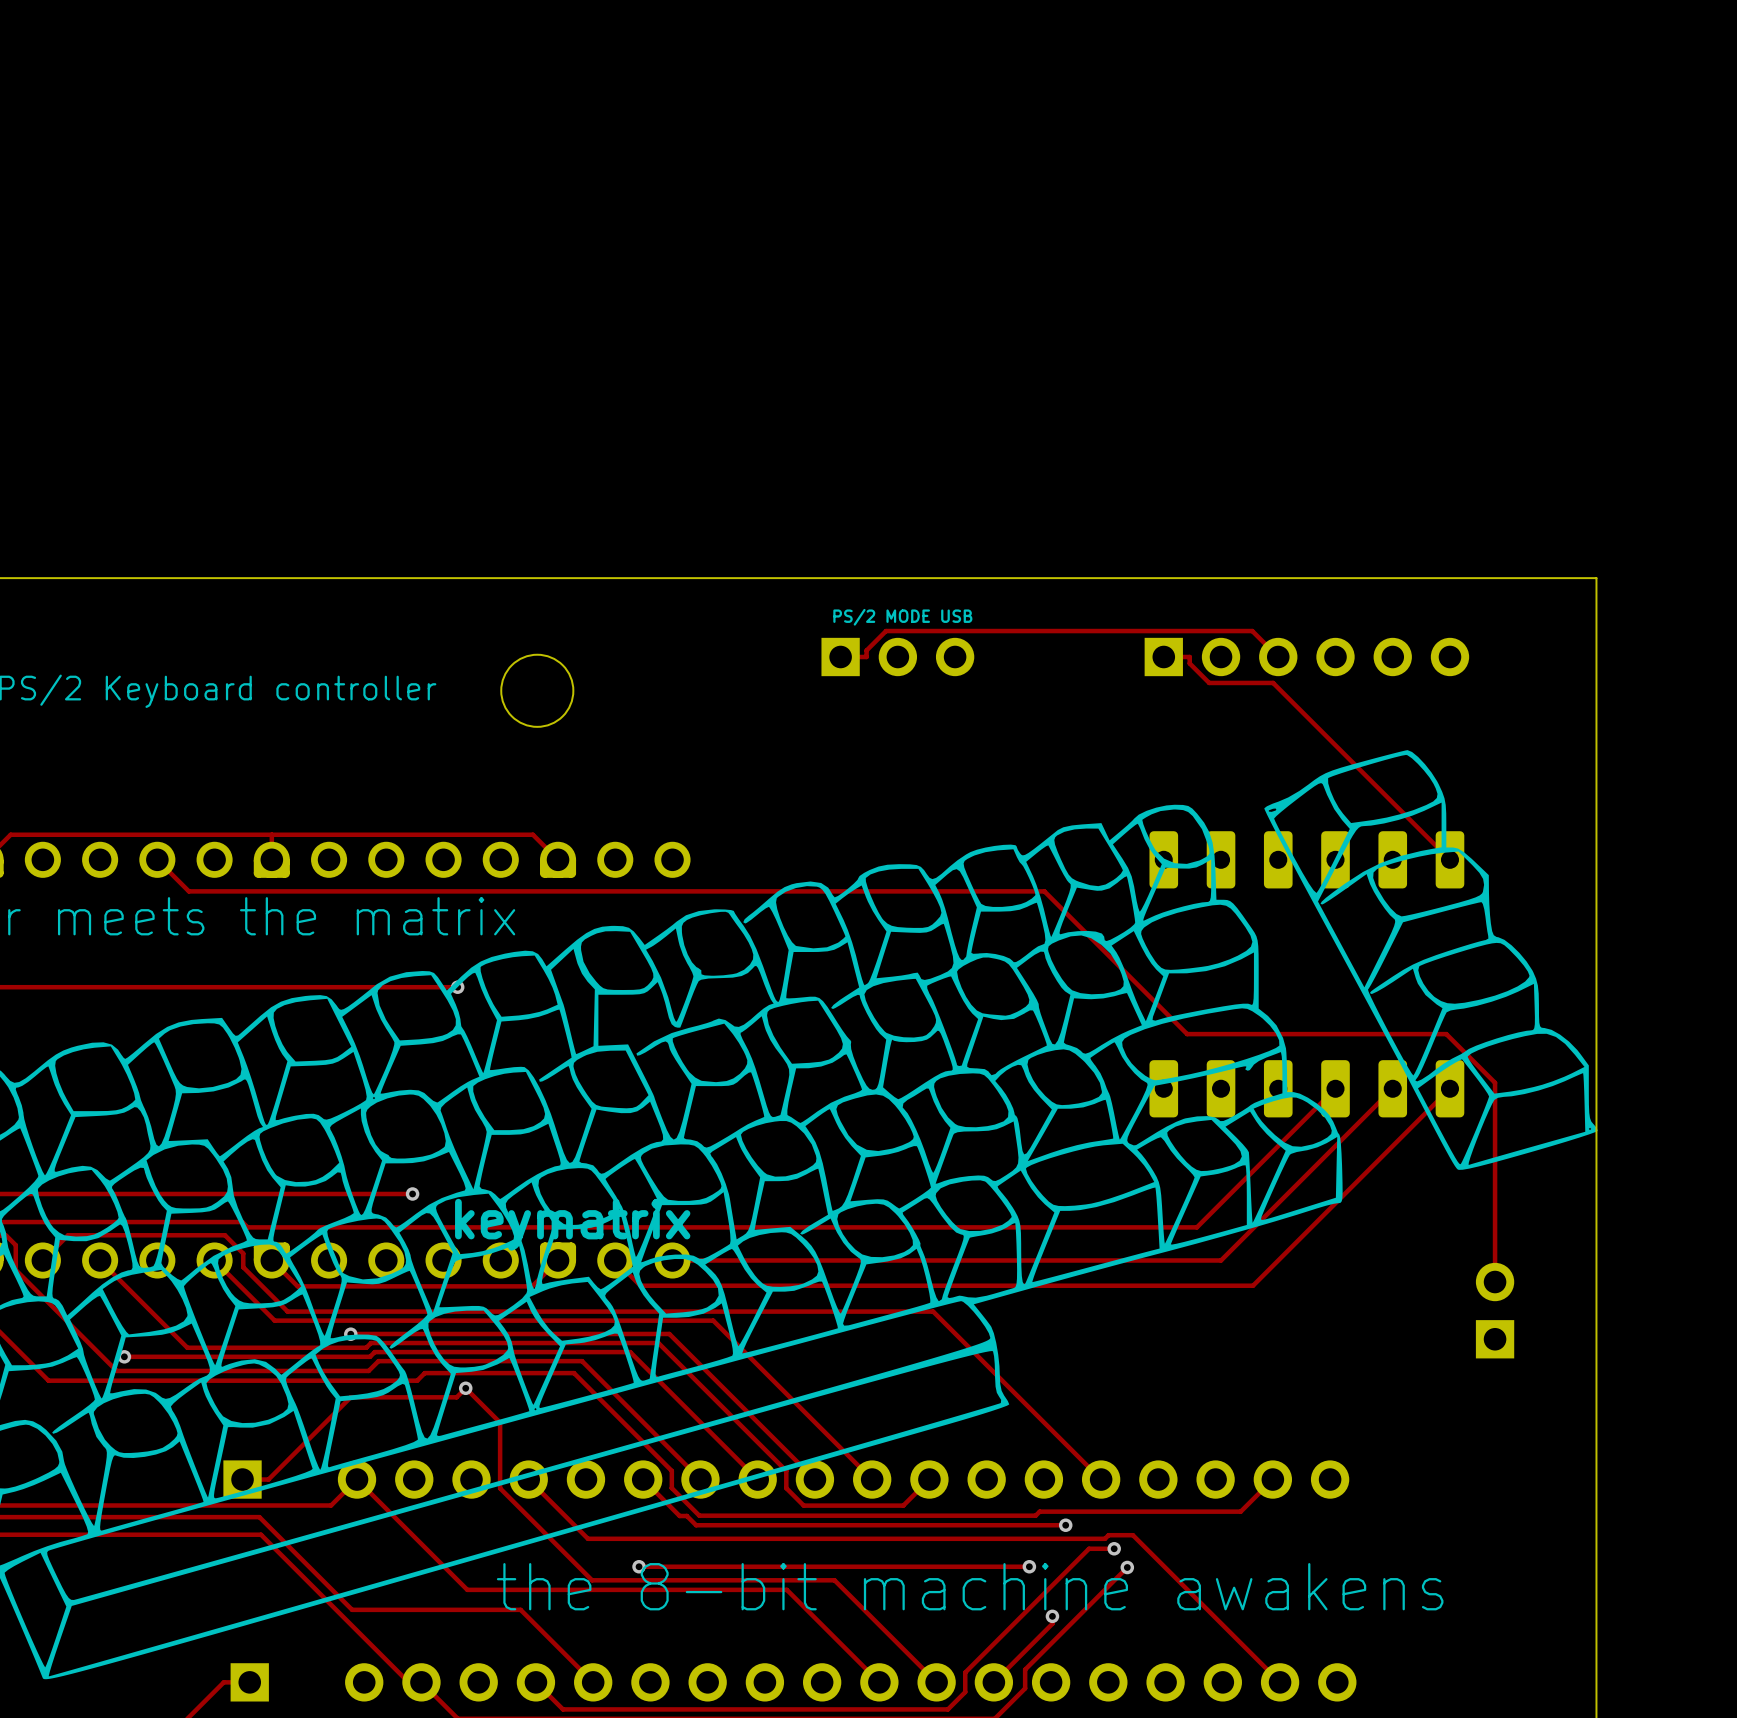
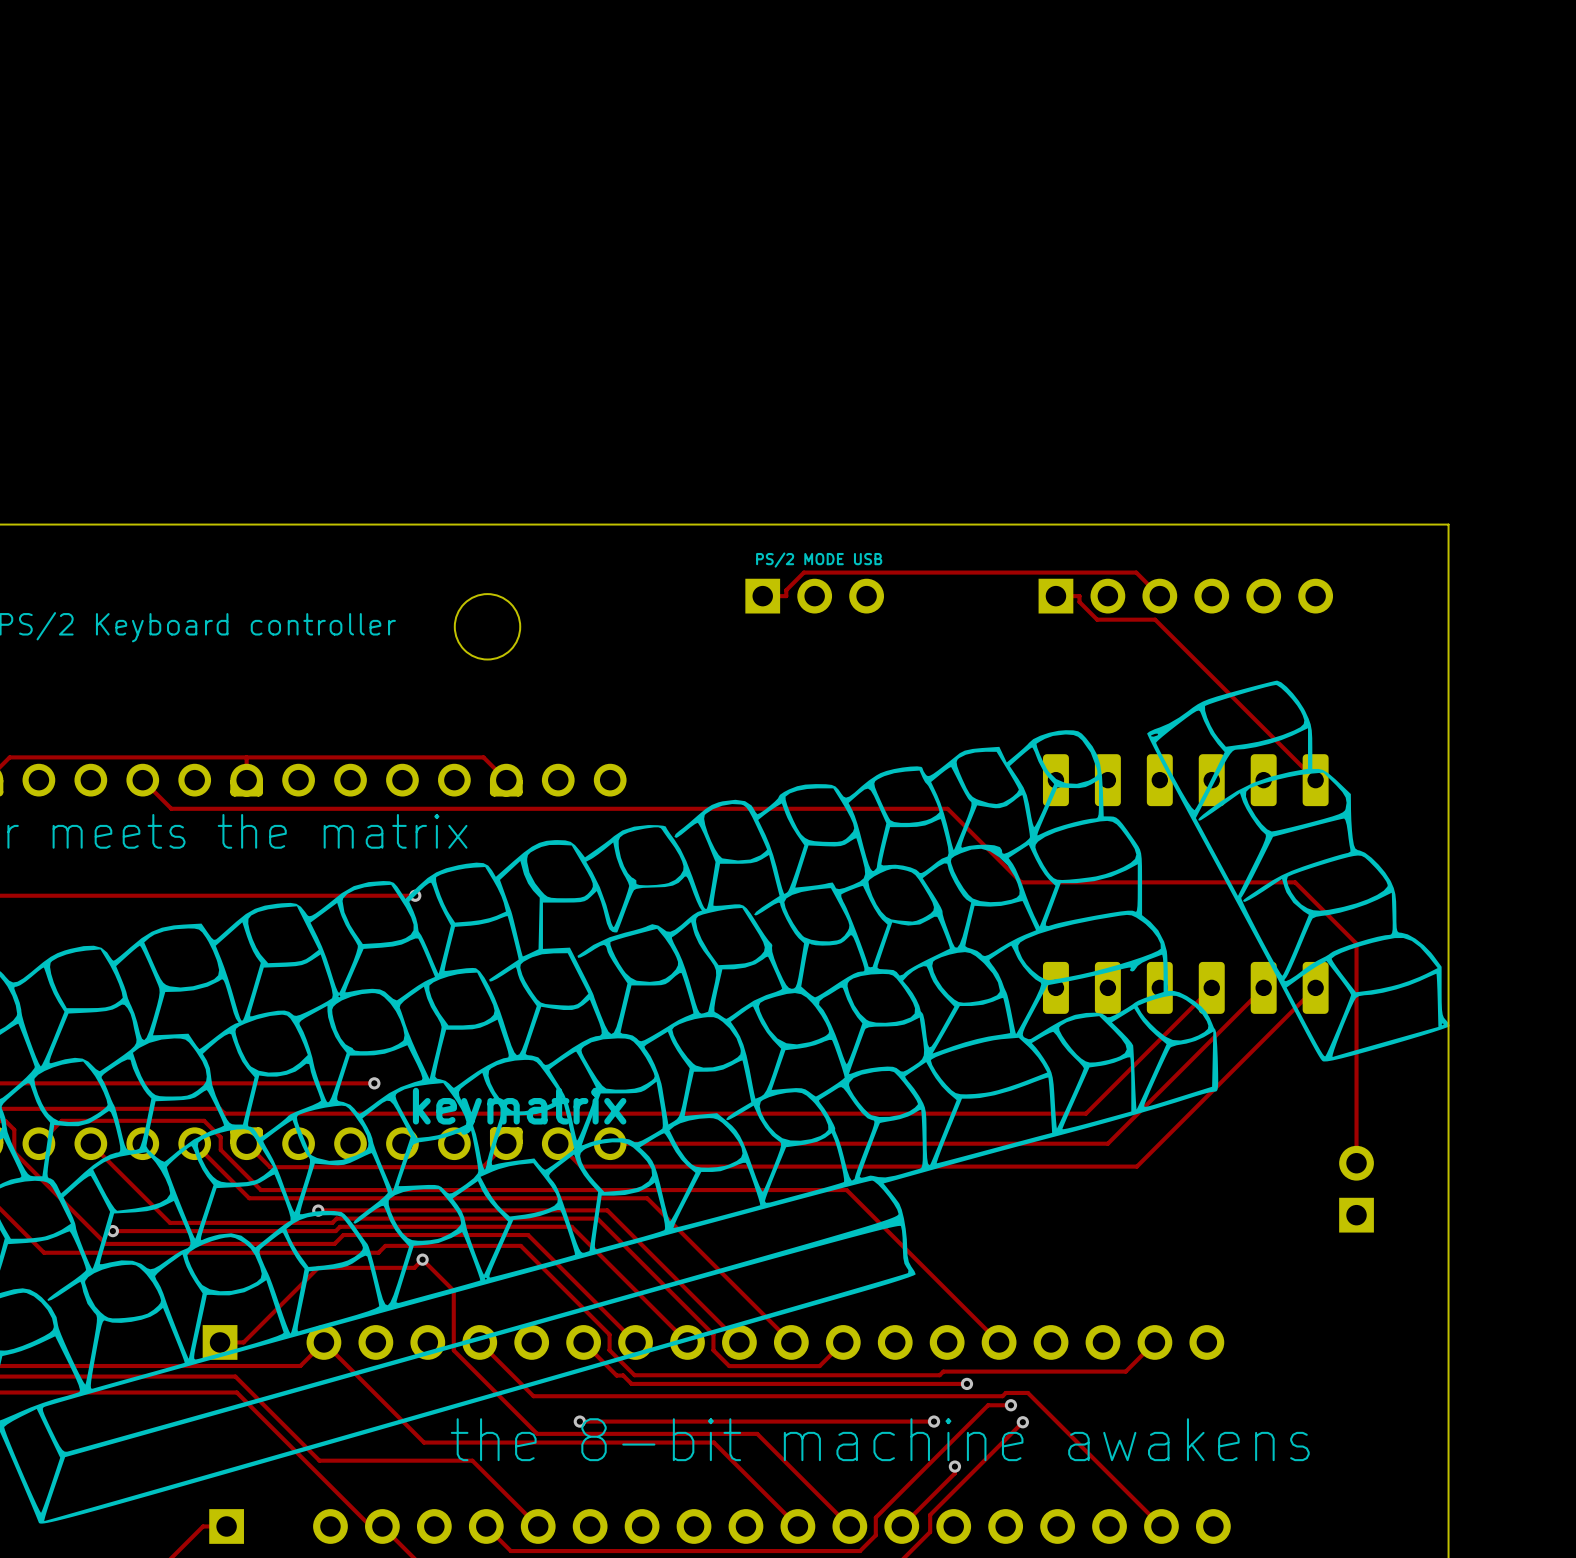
track: (1125, 972) (1187, 1034) (1446, 1034) (1495, 1082) -> (1021, 882) (1295, 882) (1356, 943) (1356, 982)

